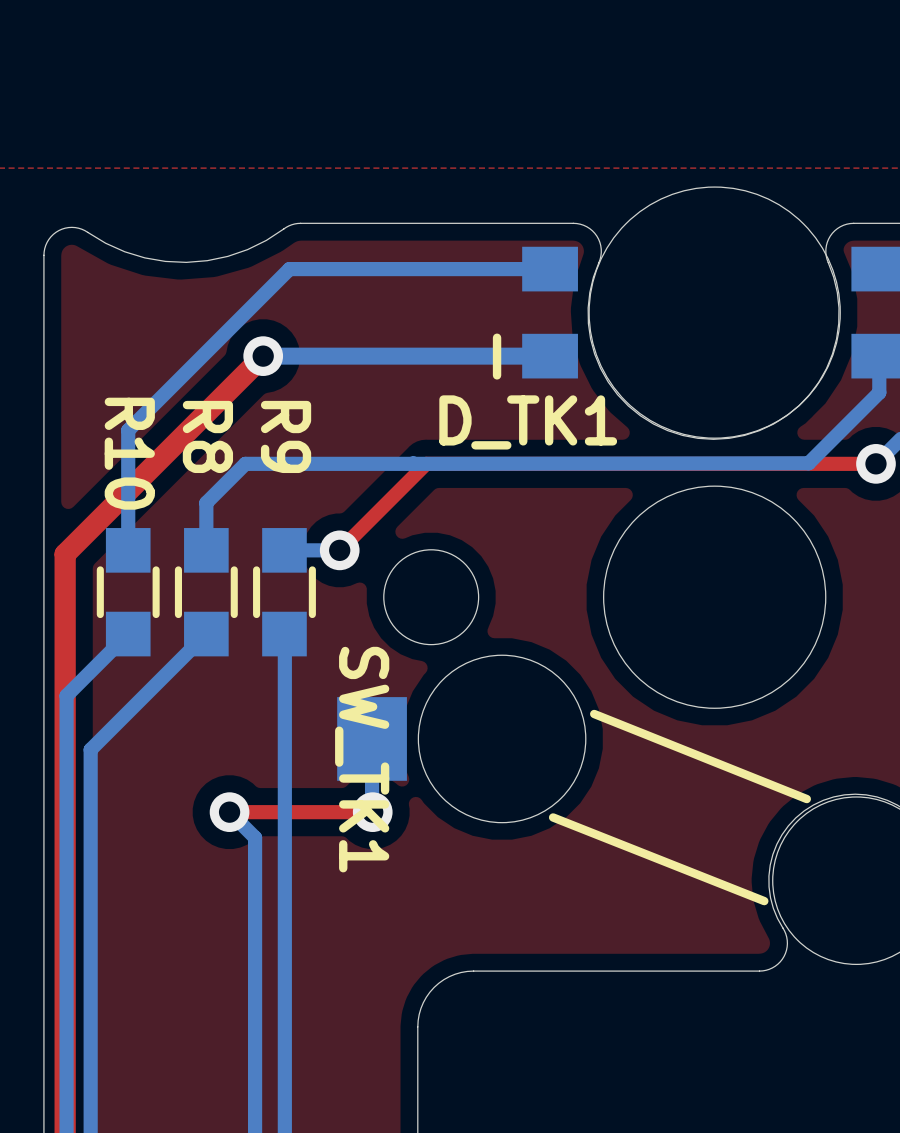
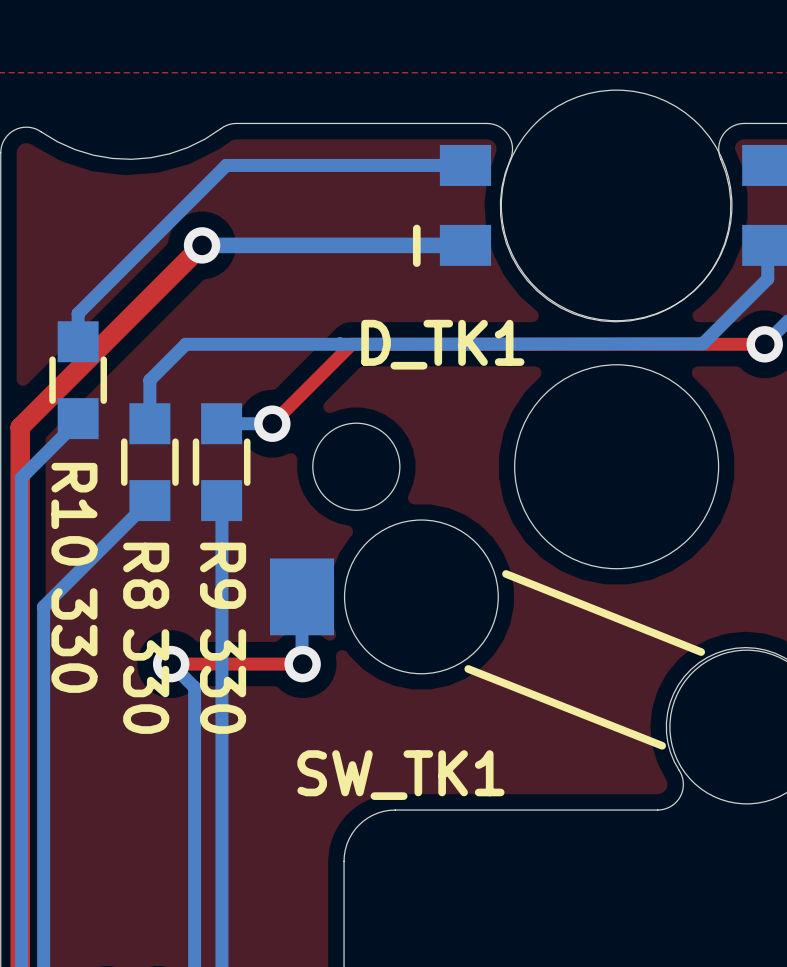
D_TK1 name position: D_TK1 (528, 422) -> D_TK1 (442, 344)
R8 name position: R8 (207, 436) -> R8 (146, 575)
R9 name position: R9 (286, 436) -> R9 (223, 575)
R10 name position: R10 (129, 453) -> R10 (74, 514)
bottom track: (128, 463) (128, 550) -> none
R10 position: (128, 592) -> (78, 380)
bottom track: (128, 634) (66, 695) -> (78, 421) (21, 477) (21, 557)
SW_TK1 name rotation: 0° (362, 759) -> 90° counterclockwise (400, 775)
R10 value: none -> 330 (74, 640)
R8 value: none -> 330 (146, 681)
R9 value: none -> 330 (223, 681)

